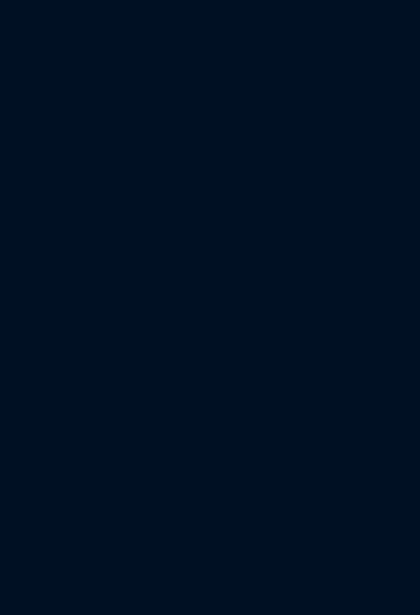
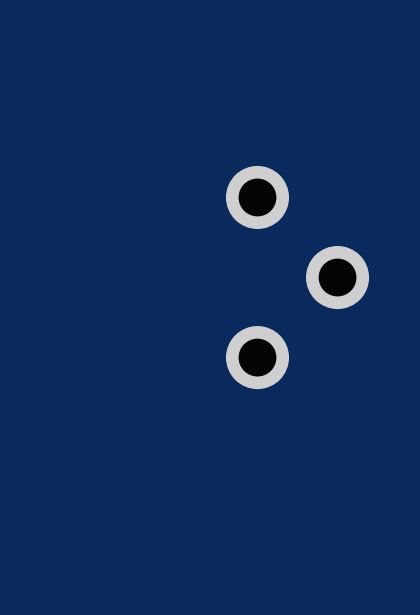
part: none -> (297, 277)

